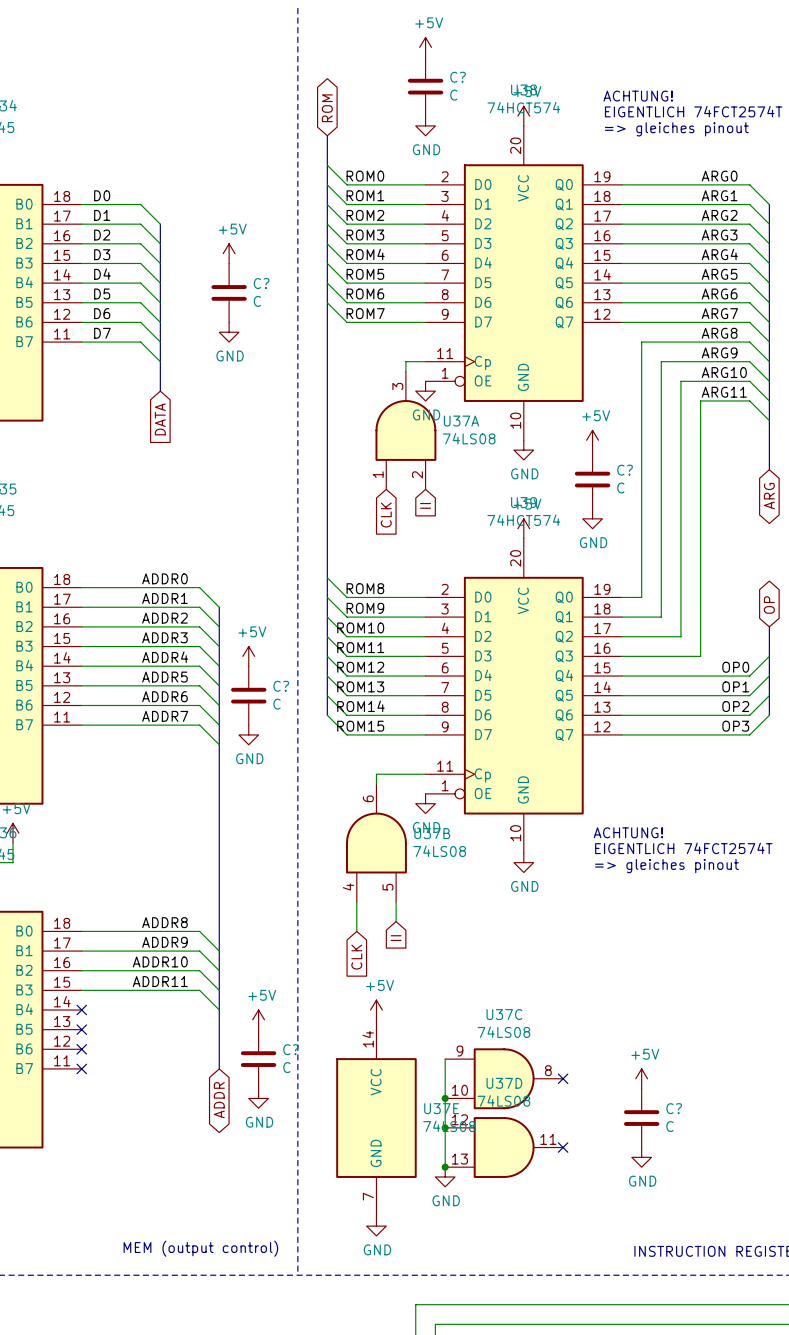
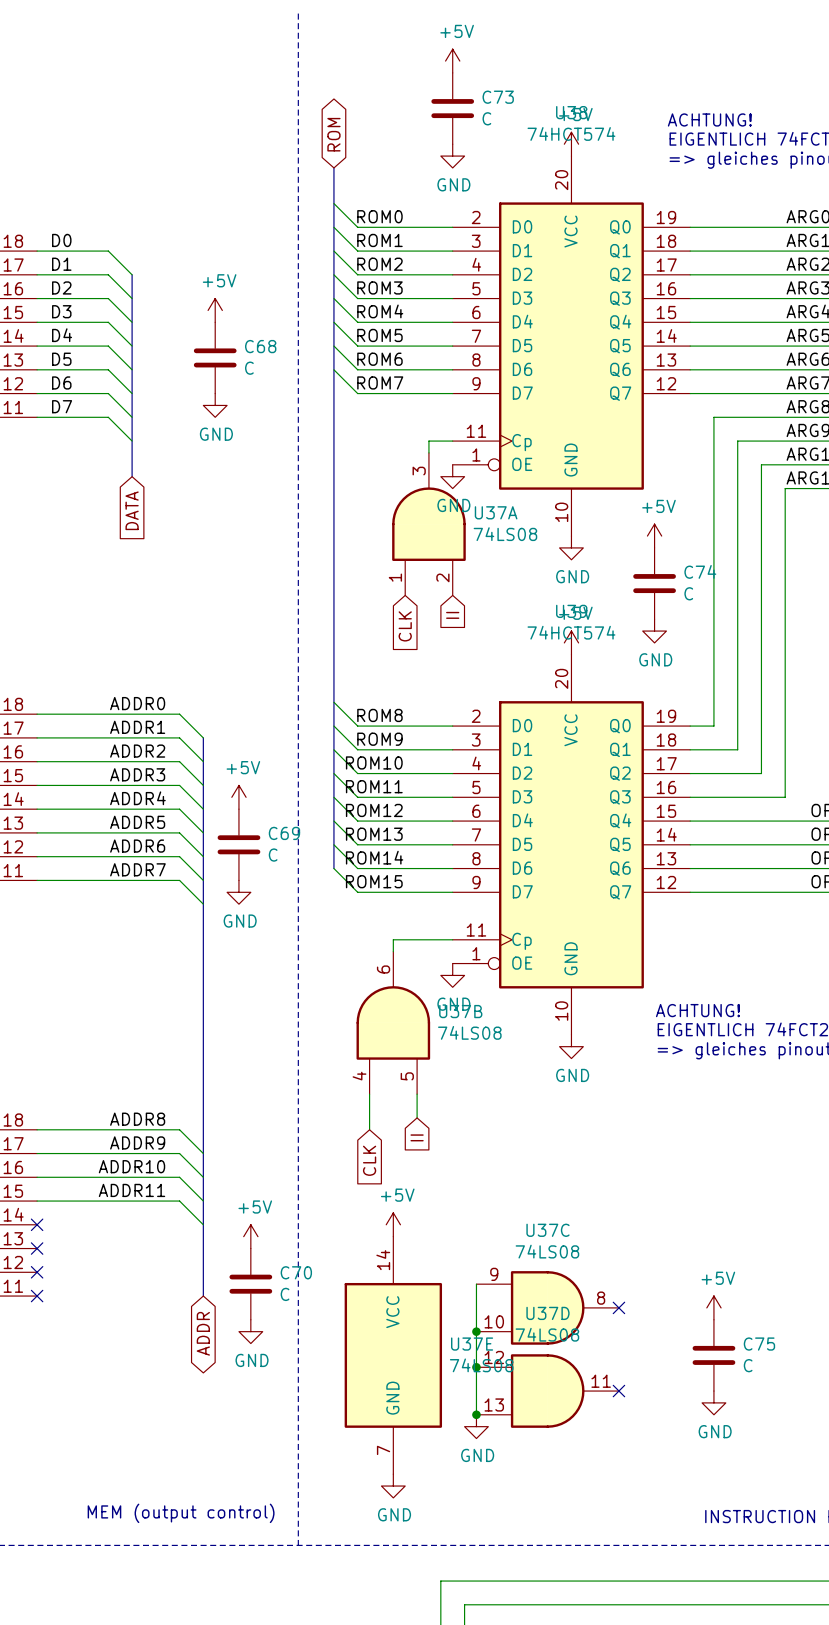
C? name: C? (458, 77) -> C73 (498, 97)
C? name: C? (261, 283) -> C68 (260, 346)
C? name: C? (625, 470) -> C74 (700, 571)
C? name: C? (281, 686) -> C69 (284, 833)
C? name: C? (291, 1049) -> C70 (296, 1272)
C? name: C? (674, 1108) -> C75 (759, 1344)

